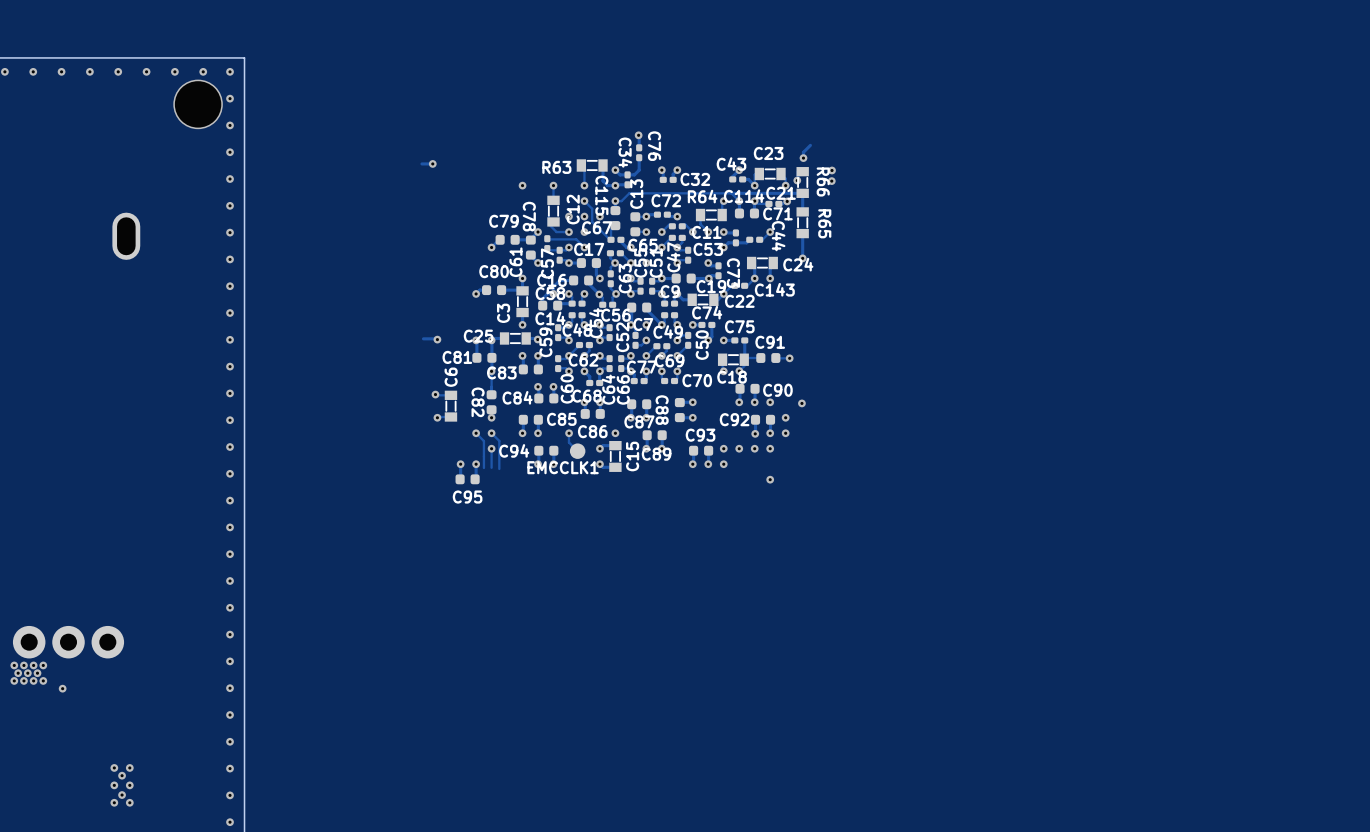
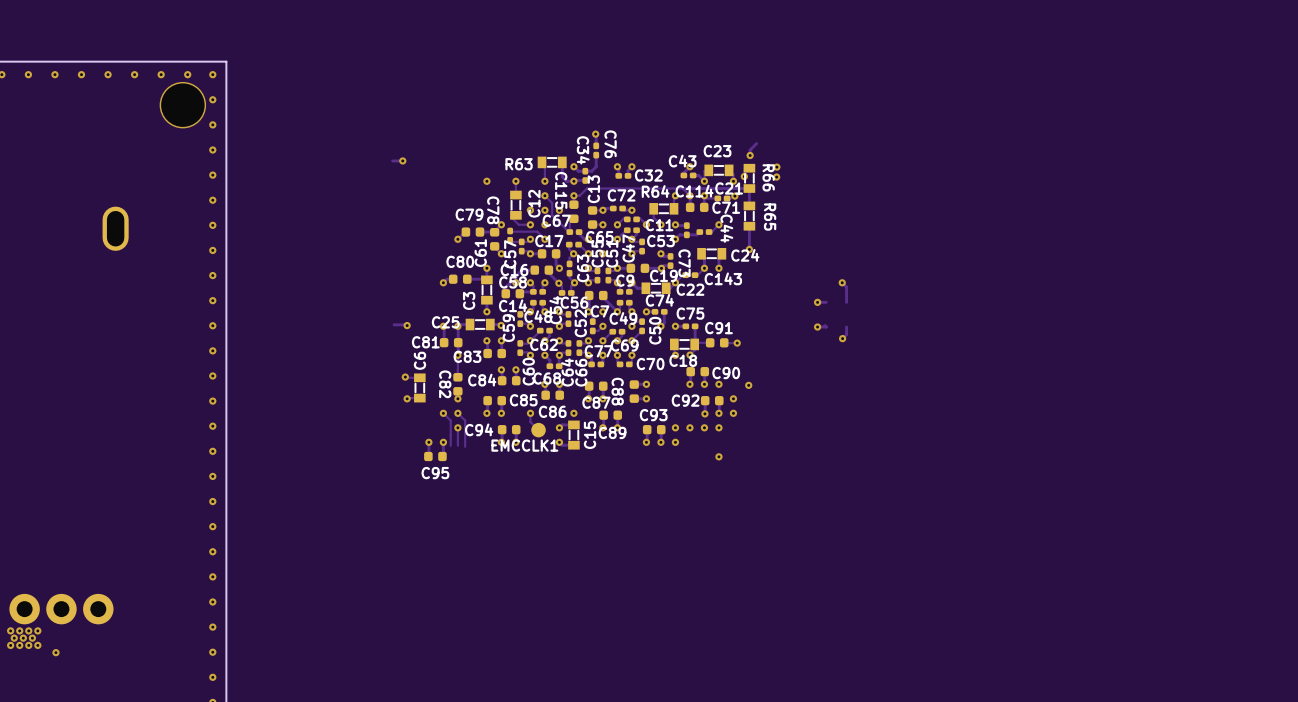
track: none -> (842, 282) (846, 287) (846, 302)
via: none -> (842, 282)
via: none -> (817, 302)
track: none -> (826, 302) (817, 302)
track: none -> (824, 325) (826, 327) (817, 327)
via: none -> (817, 327)
track: none -> (846, 327) (846, 334) (842, 338)
via: none -> (842, 338)

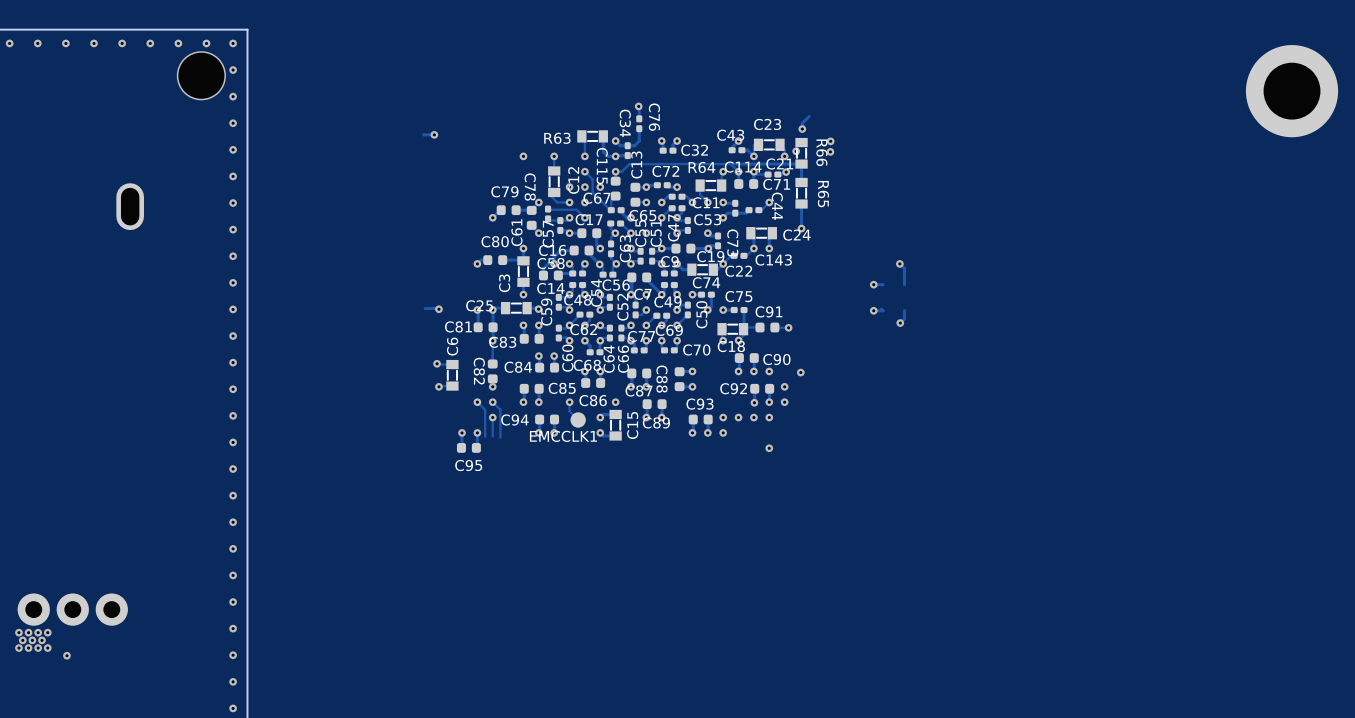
part: none -> (1292, 91)

